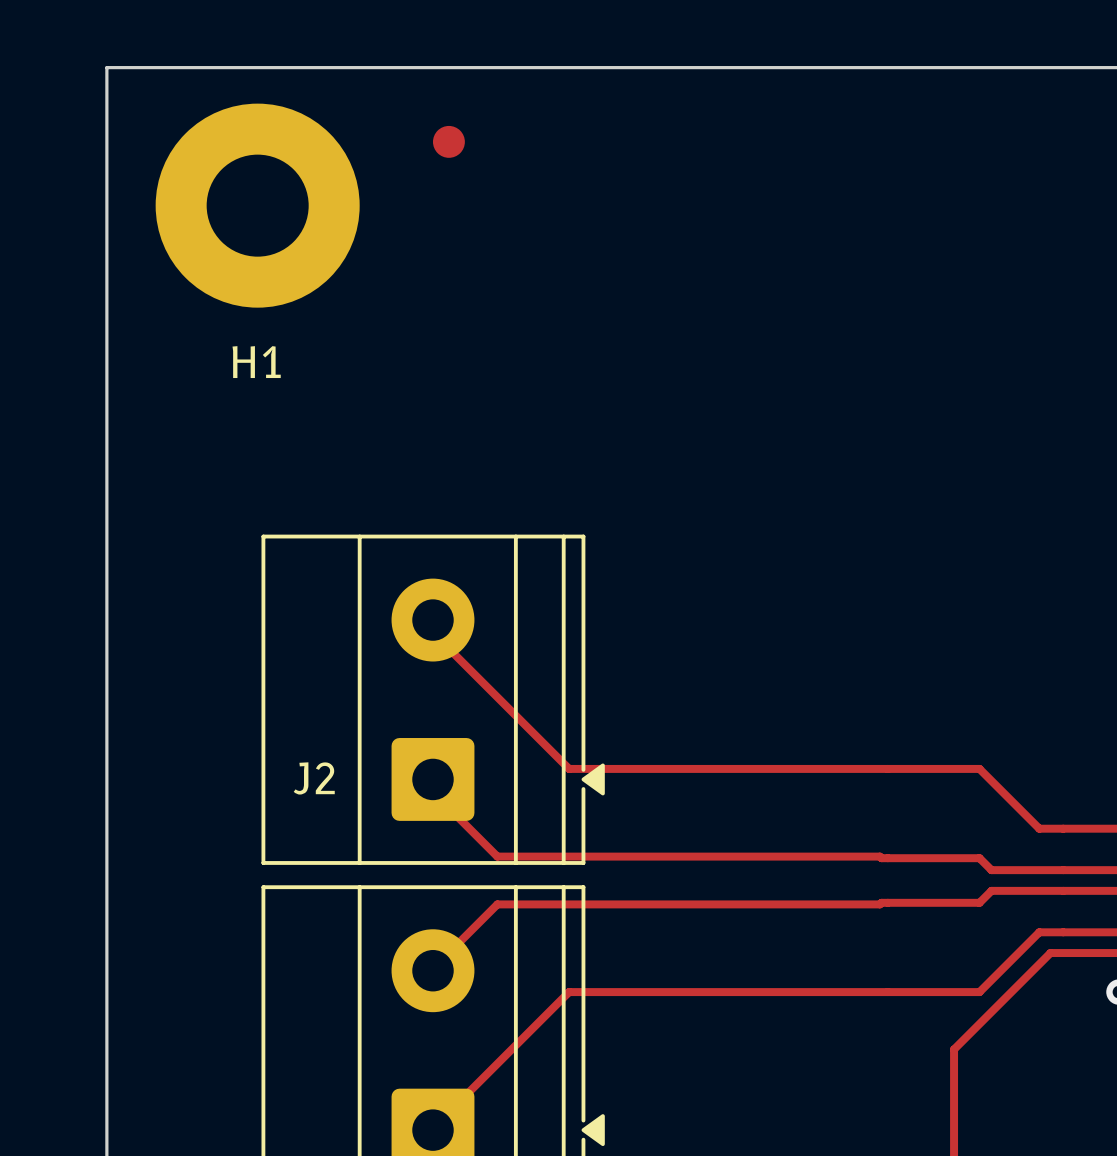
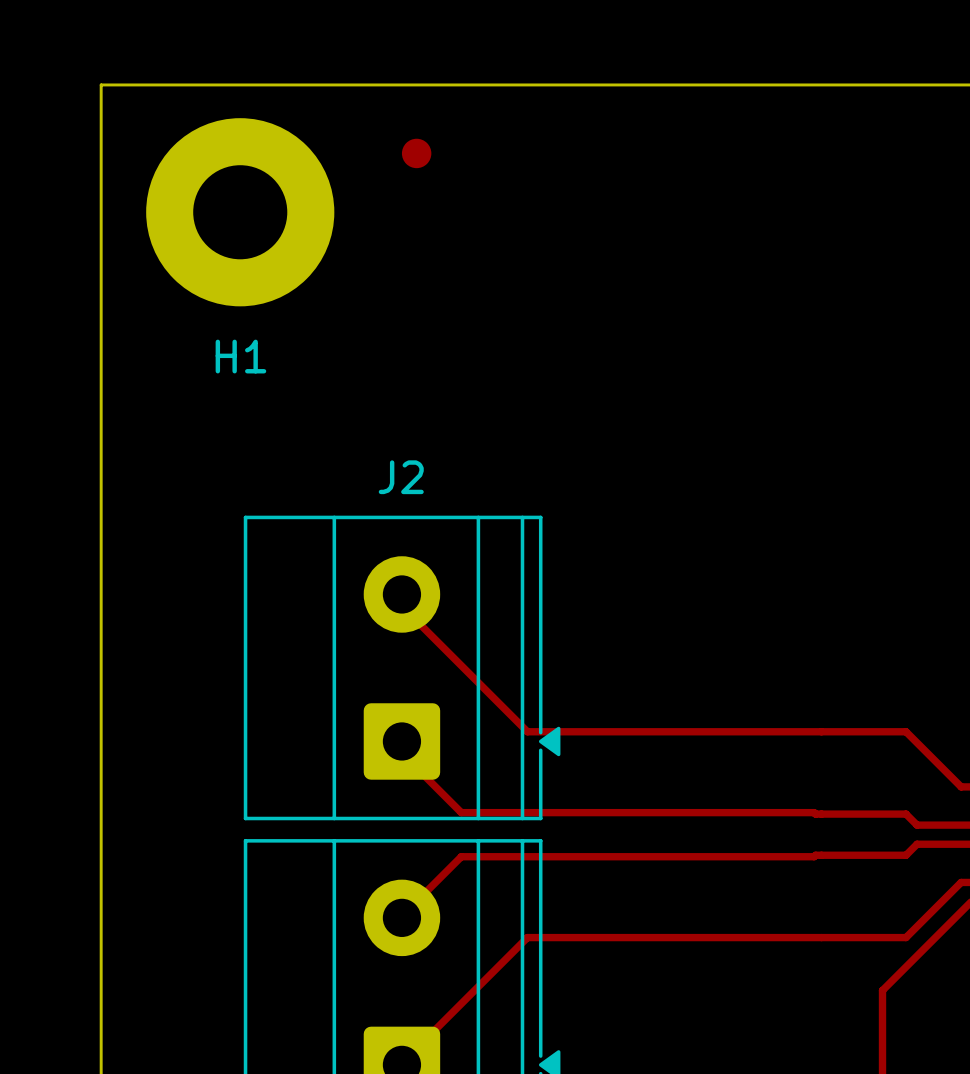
J2 name position: J2 (314, 778) -> J2 (401, 477)

